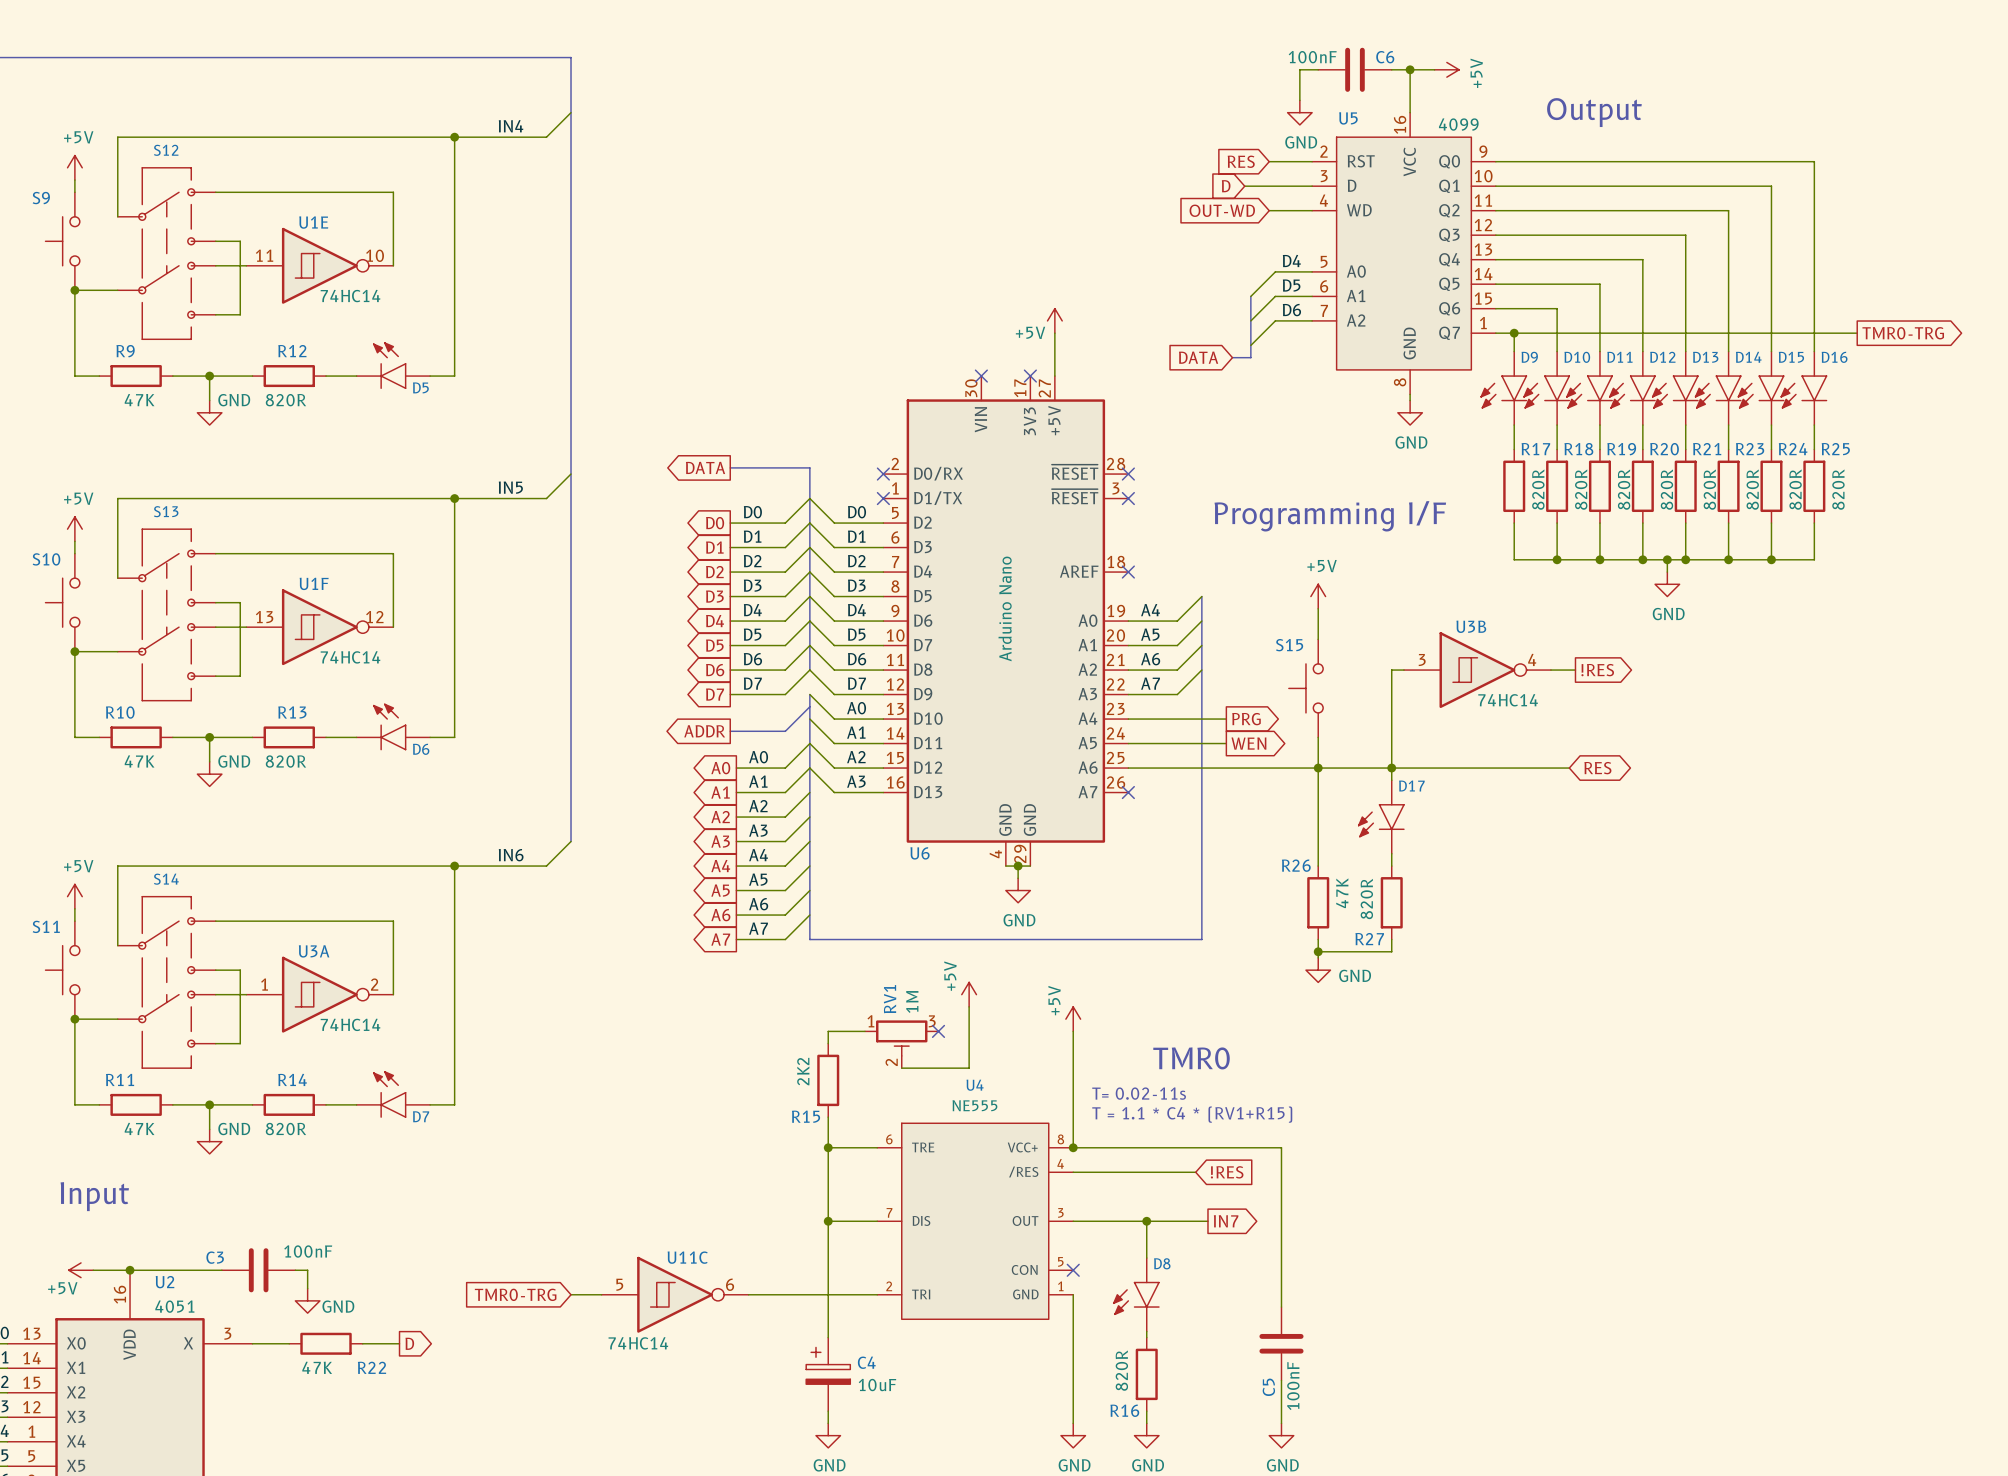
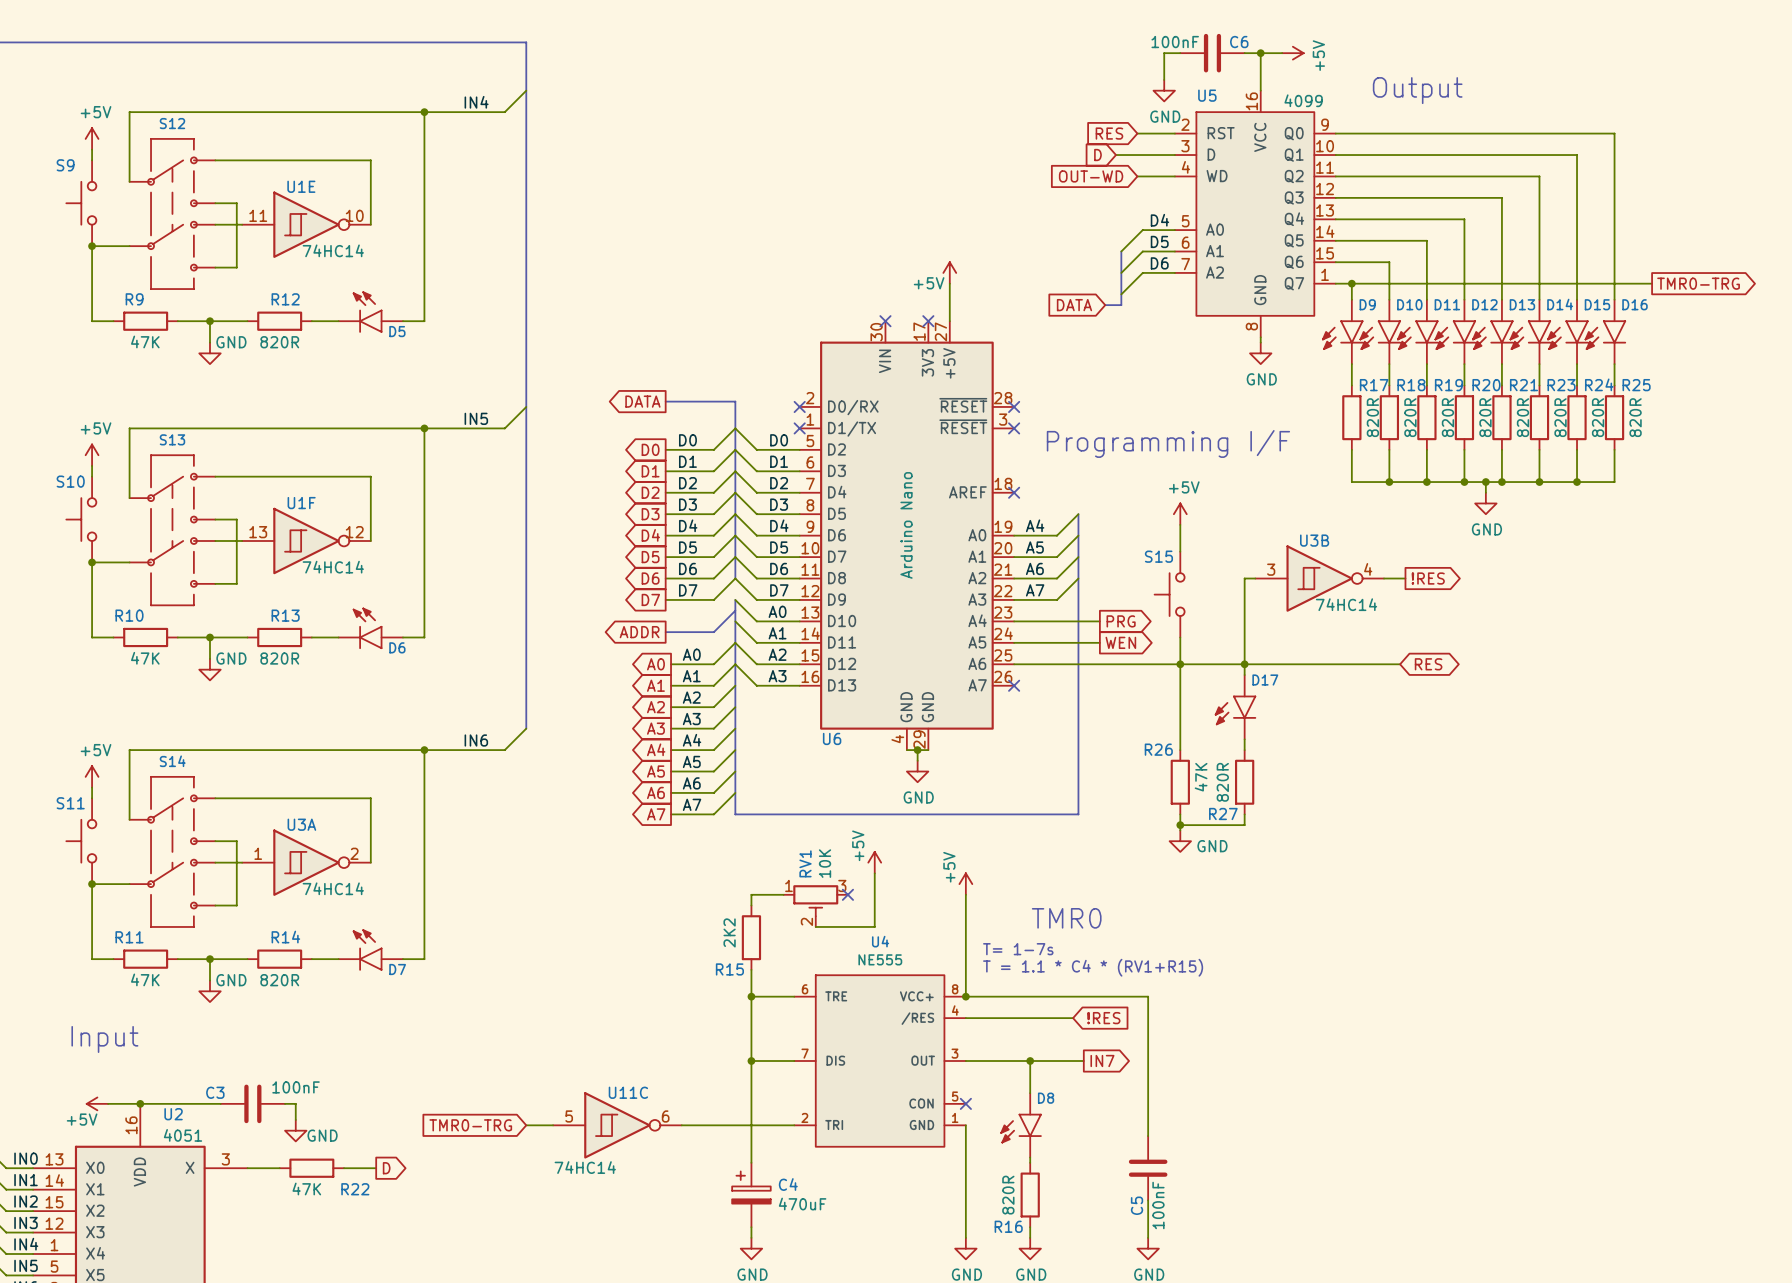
RV1 value: 1M (912, 1001) -> 10K (825, 863)
text: T= 0.02-11s (1139, 1093) -> T= 1-7s (1018, 949)
C4 value: 10uF (877, 1385) -> 470uF (802, 1204)

